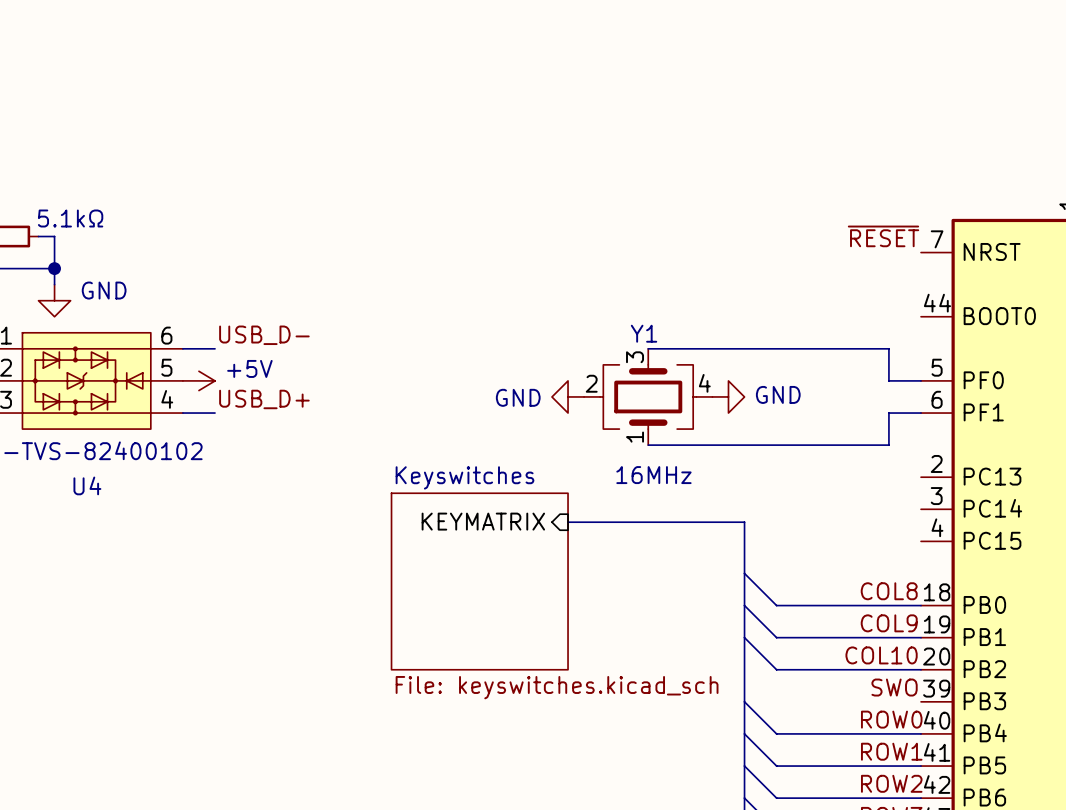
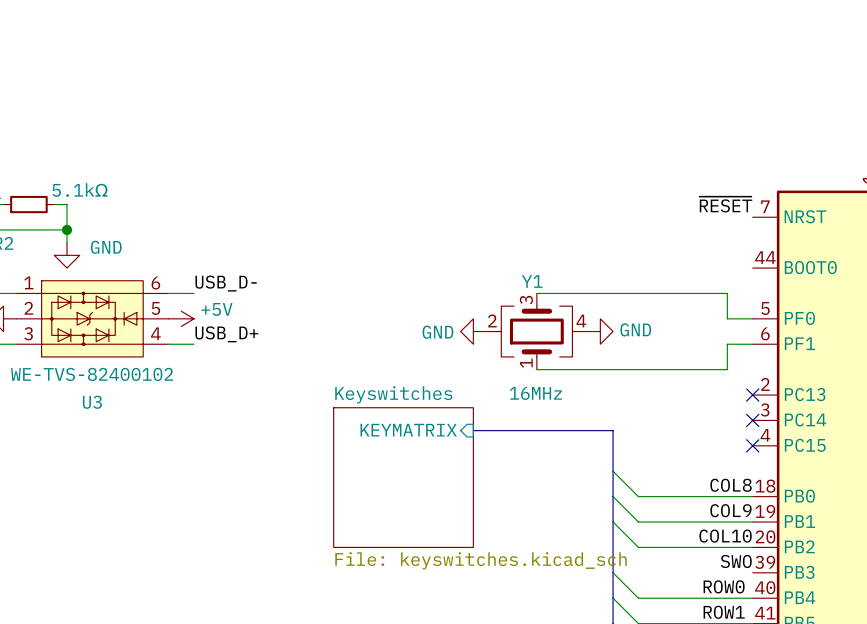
no-connect mark: none -> (752, 395)
U4 name: U4 (87, 485) -> U3 (92, 402)
no-connect mark: none -> (752, 420)
no-connect mark: none -> (752, 445)

